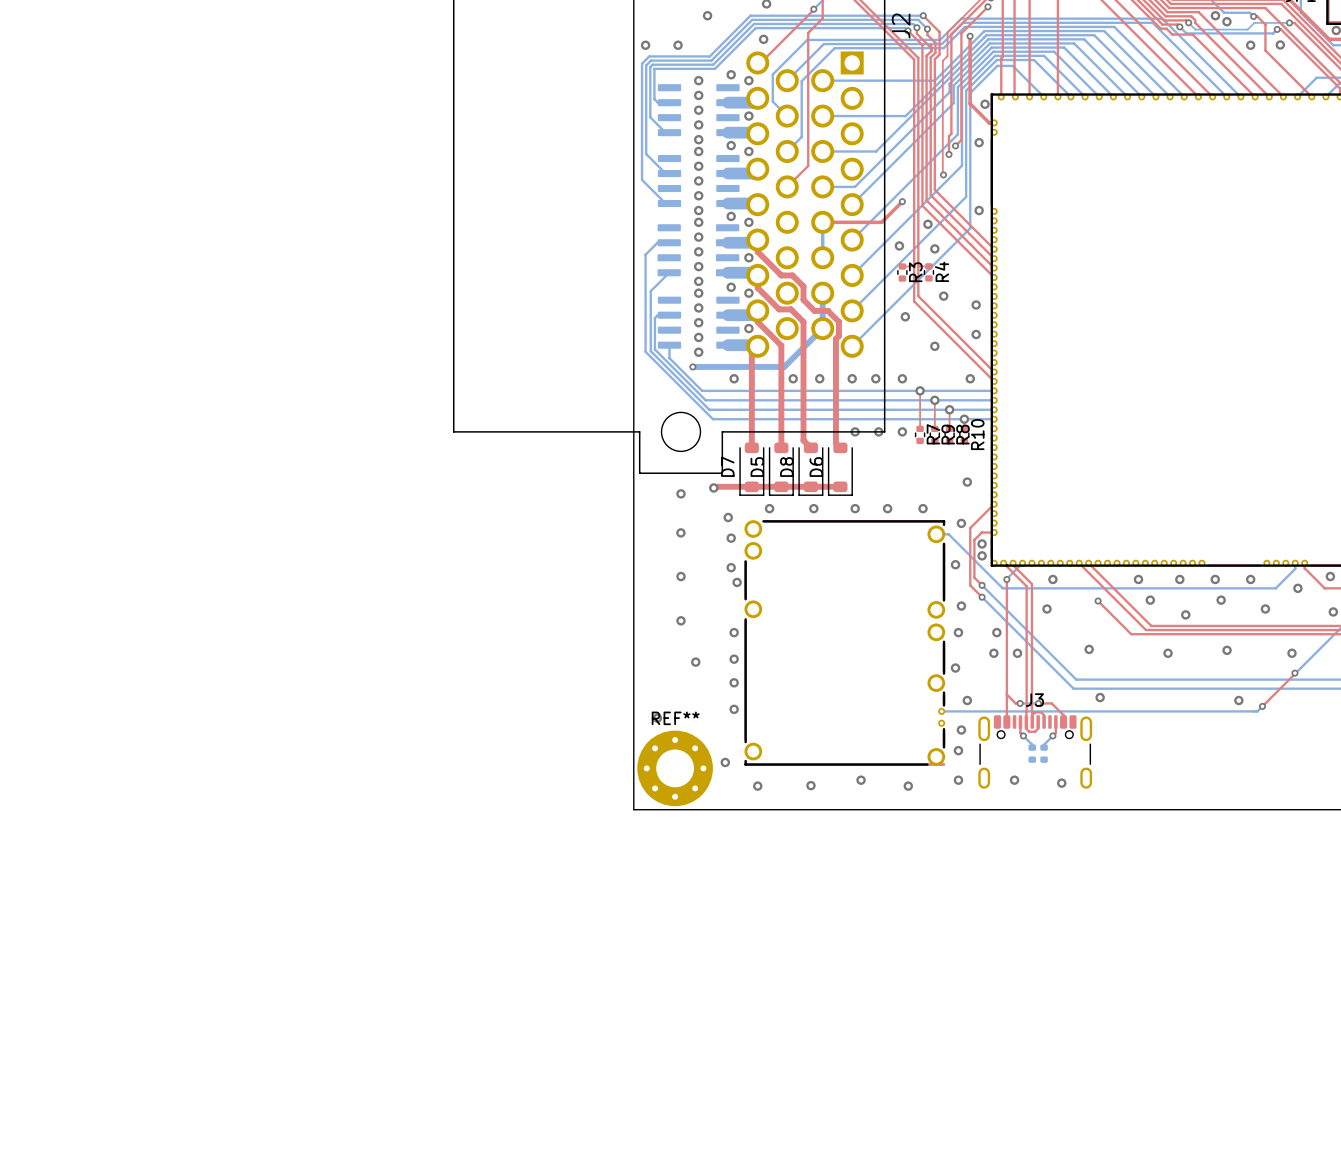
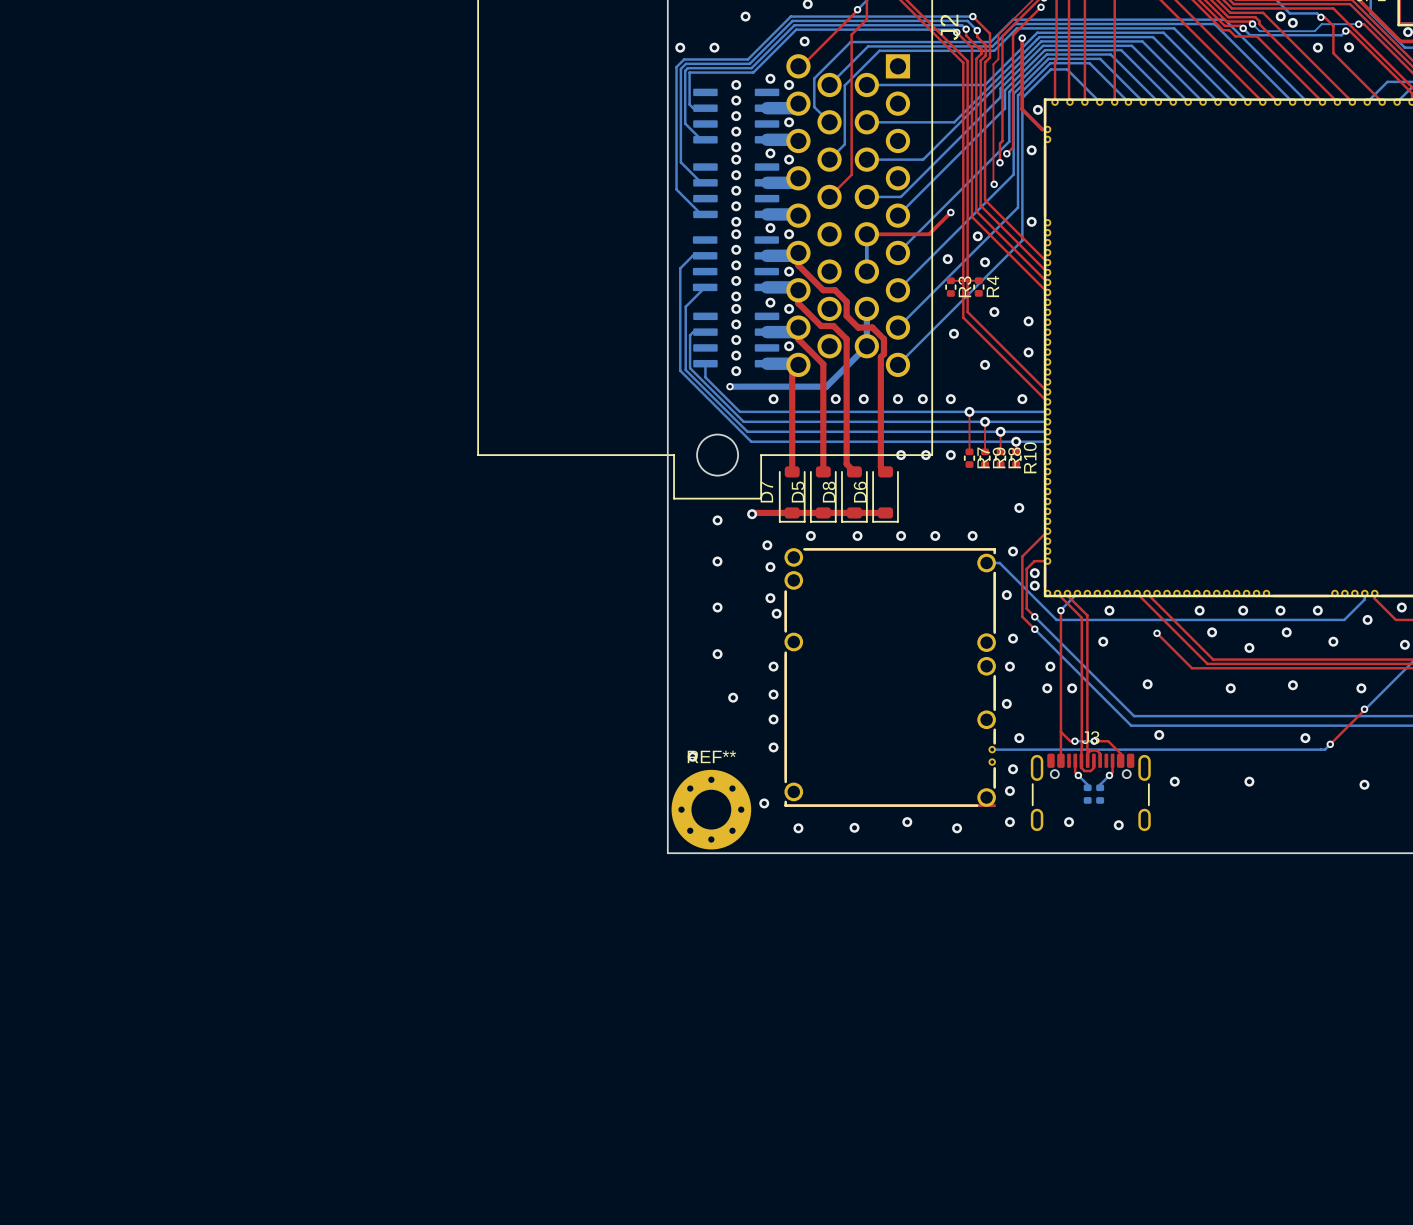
via: none -> (1174, 781)
via: none -> (1249, 781)
via: none -> (1364, 784)

